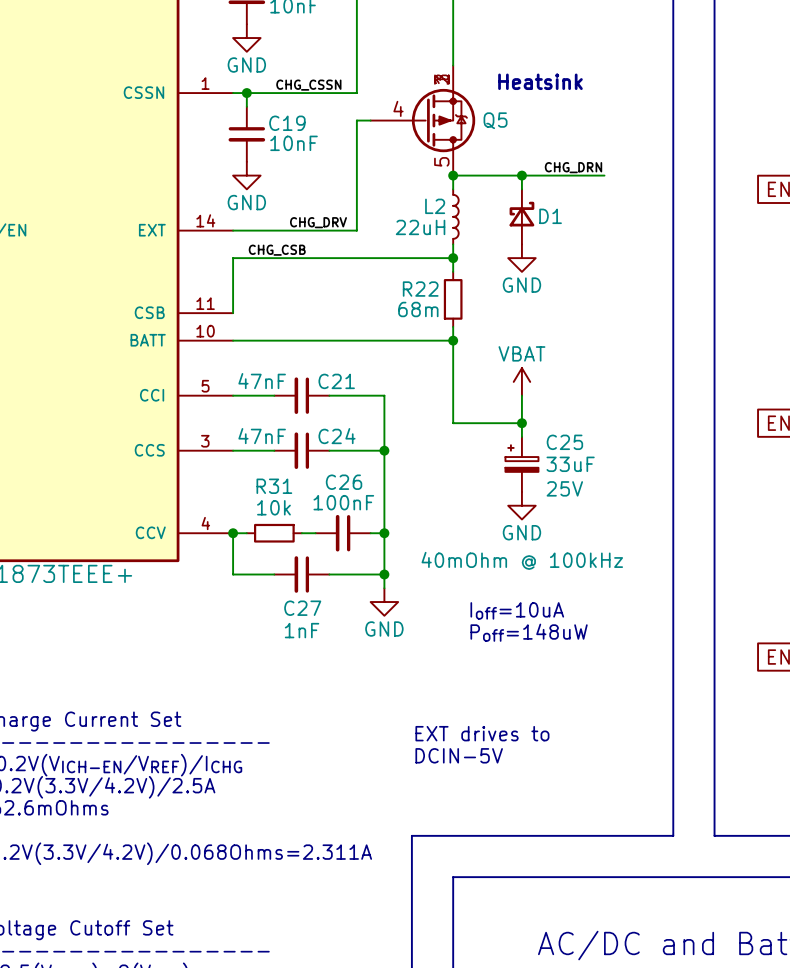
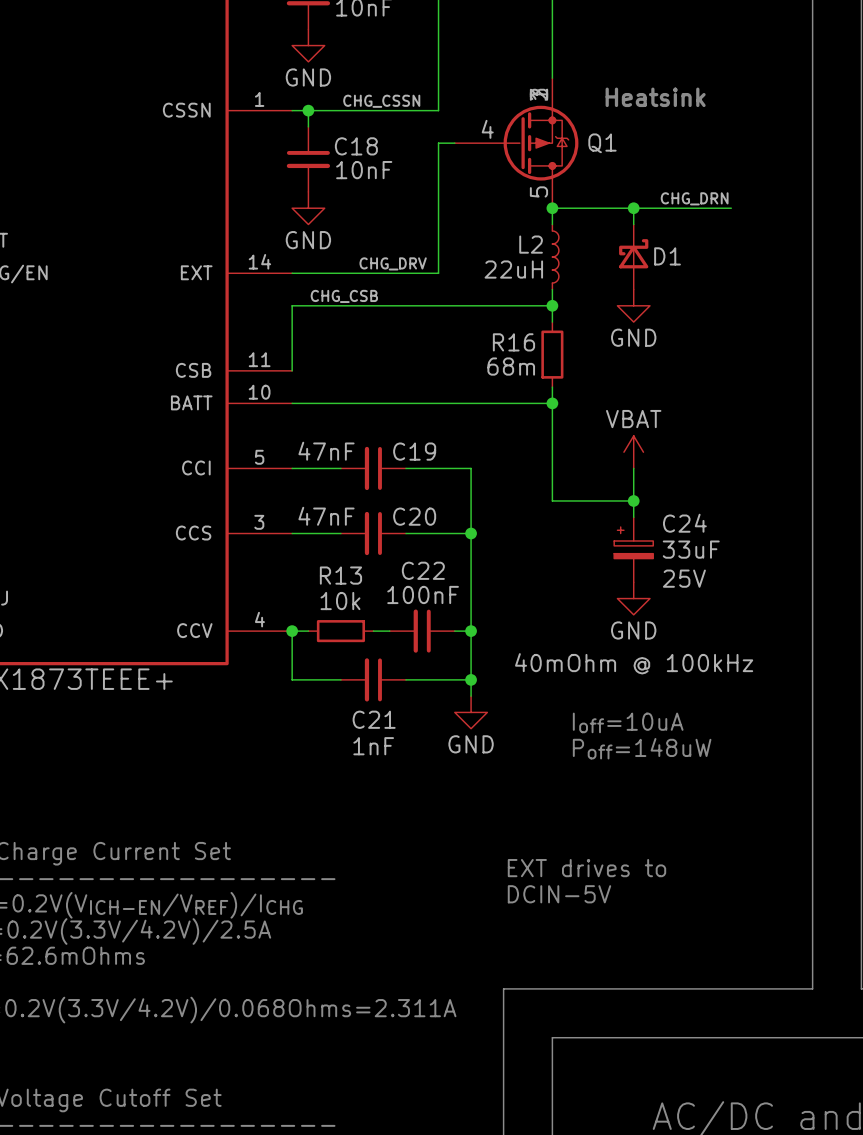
Q5 name: Q5 (495, 120) -> Q1 (602, 143)
C19 name: C19 (287, 123) -> C18 (356, 146)
R22 name: R22 (420, 289) -> R16 (513, 342)
C21 name: C21 (336, 381) -> C19 (414, 451)
C24 name: C24 (337, 436) -> C20 (414, 516)
C25 name: C25 (564, 442) -> C24 (684, 523)
C26 name: C26 (344, 482) -> C22 (423, 570)
R31 name: R31 (274, 486) -> R13 (340, 575)
C27 name: C27 (302, 608) -> C21 (374, 719)

